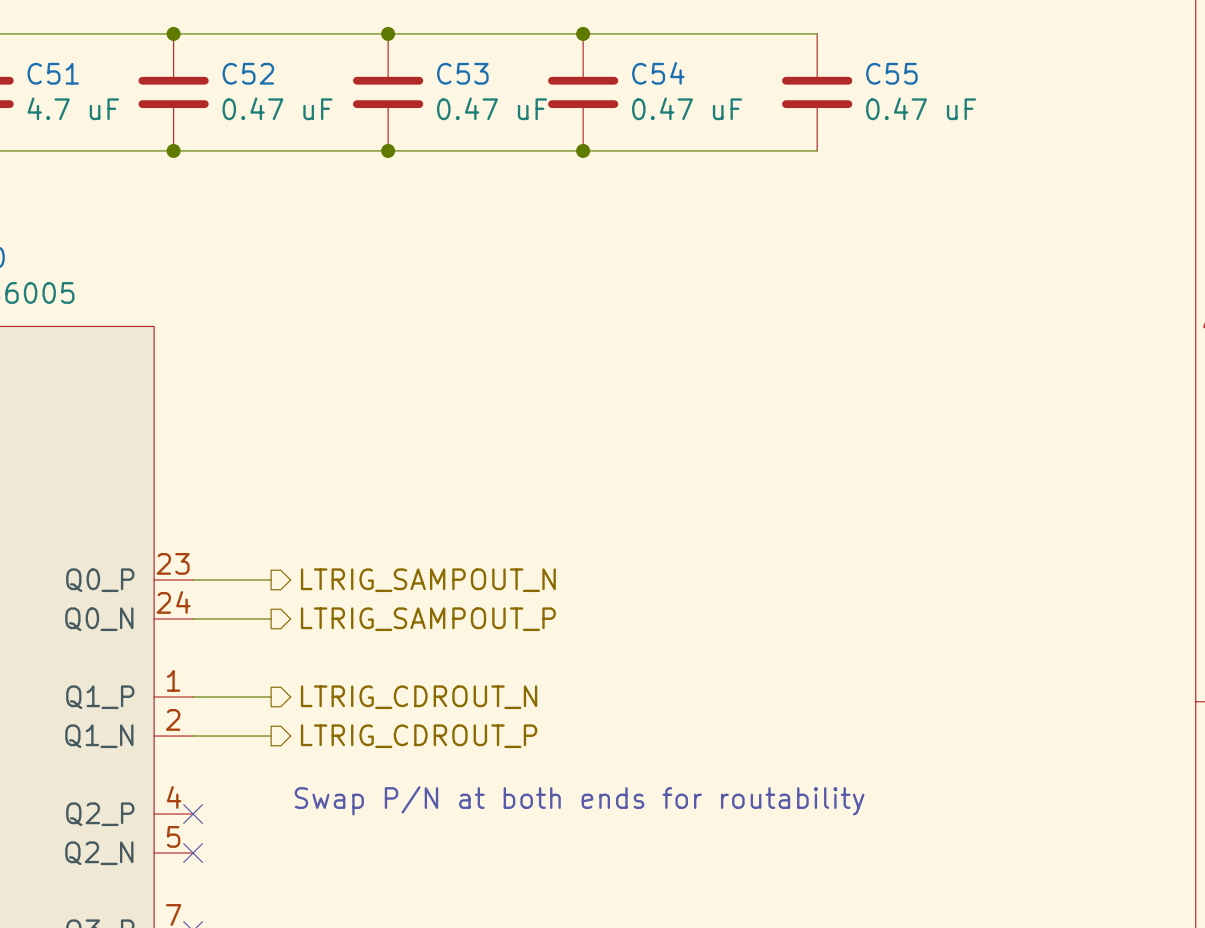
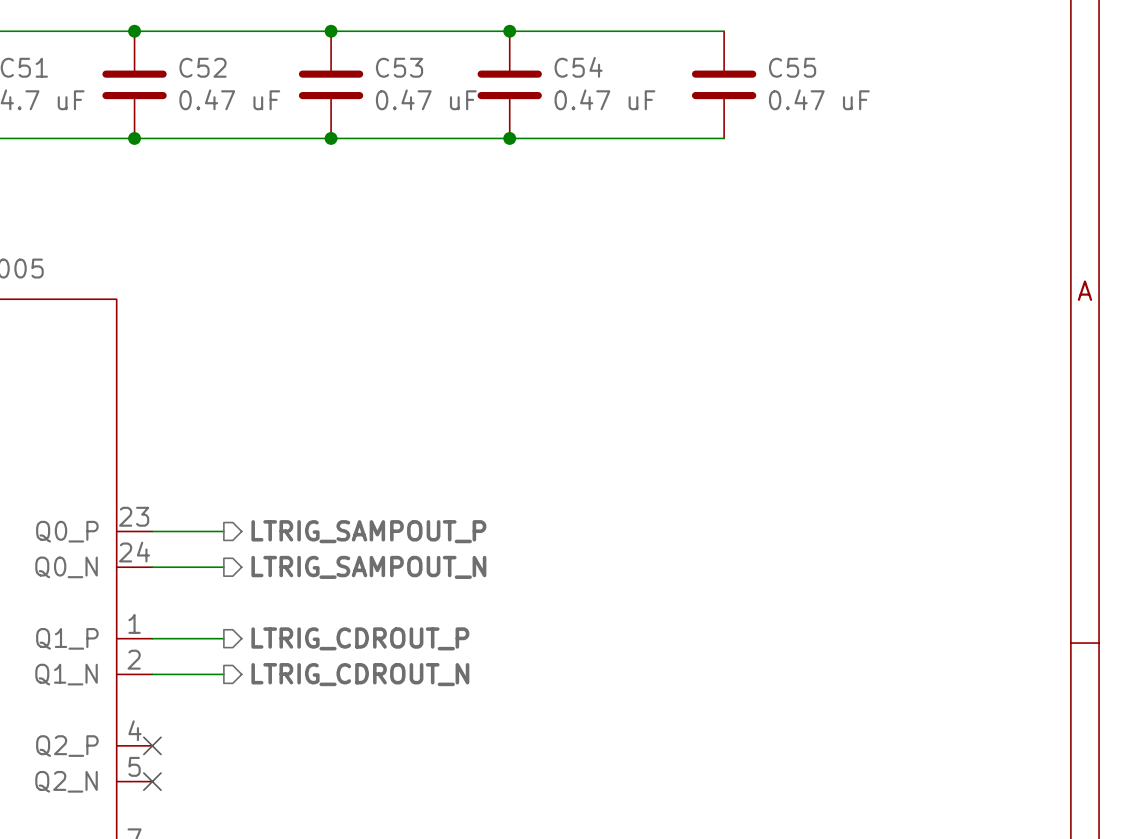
hierarchical label: LTRIG_SAMPOUT_N (428, 580) -> LTRIG_SAMPOUT_P (368, 531)
hierarchical label: LTRIG_SAMPOUT_P (428, 619) -> LTRIG_SAMPOUT_N (368, 567)
hierarchical label: LTRIG_CDROUT_N (419, 697) -> LTRIG_CDROUT_P (360, 638)
hierarchical label: LTRIG_CDROUT_P (419, 736) -> LTRIG_CDROUT_N (360, 674)
text: Swap P/N at both ends for routability (579, 800) -> none

